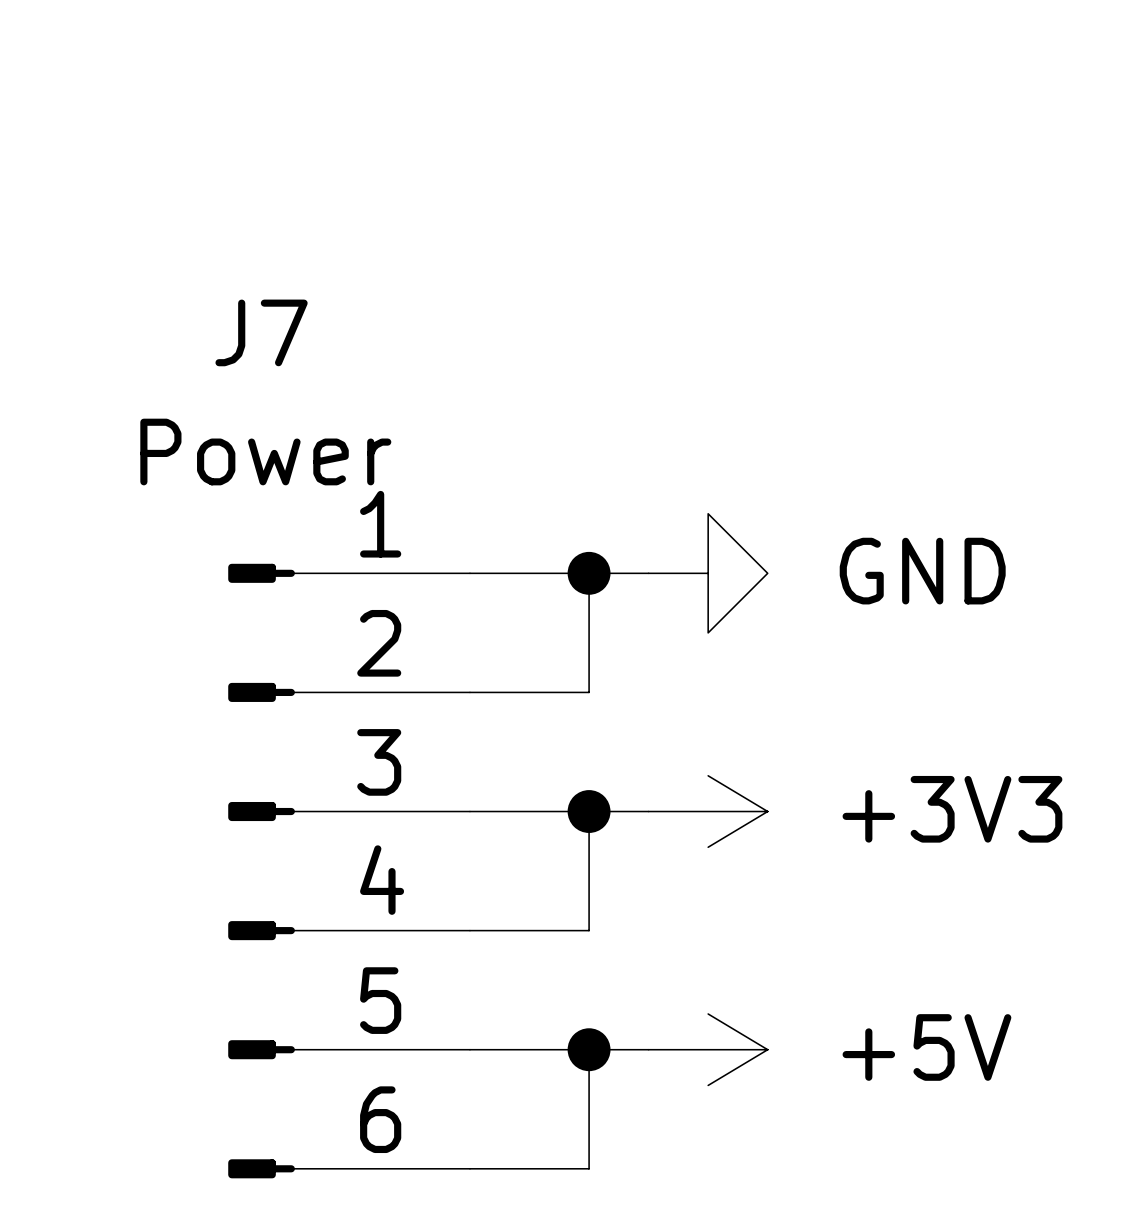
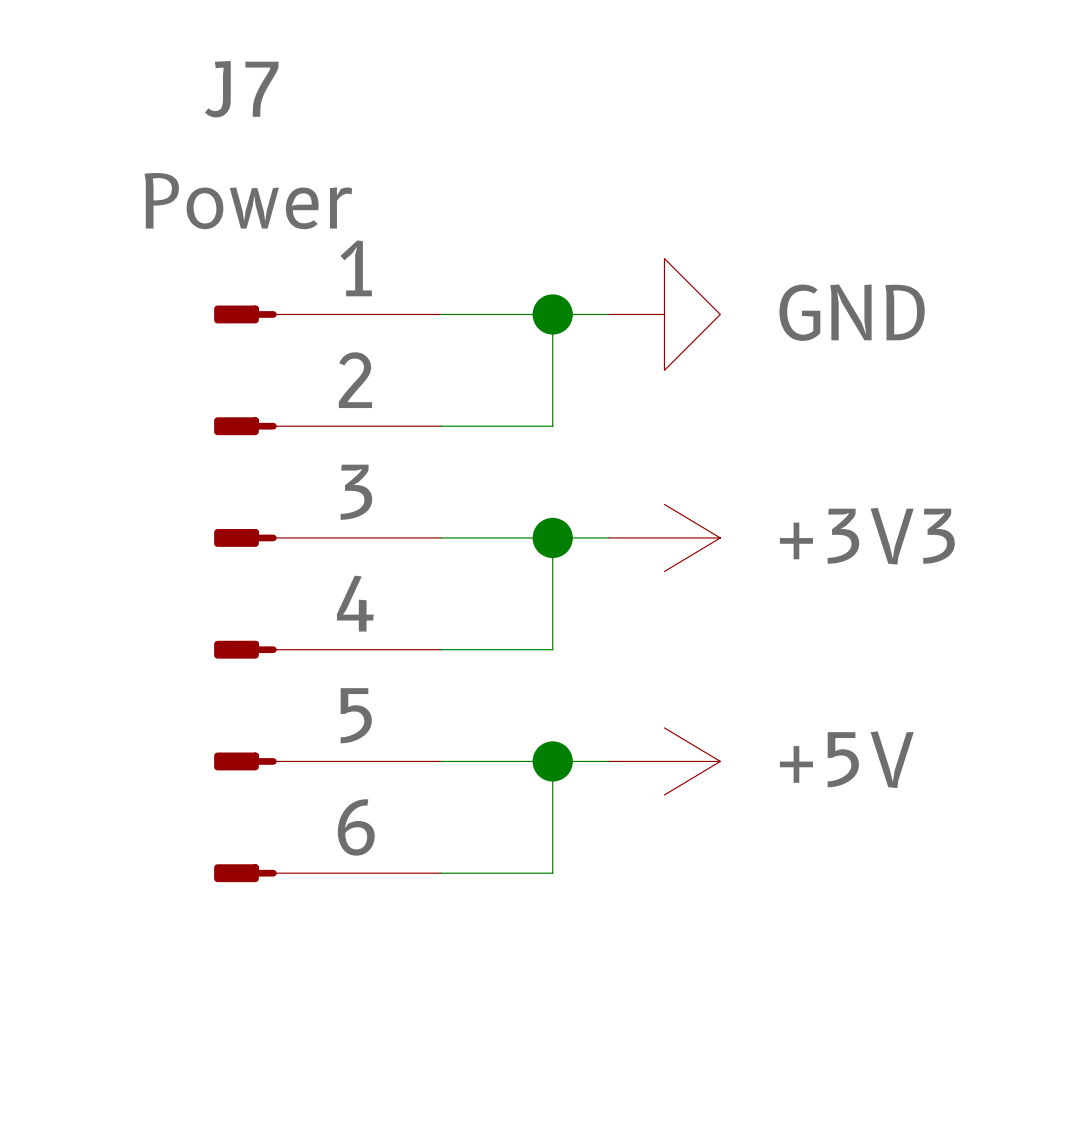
junction: none -> (552, 314)
power symbol: none -> GND (664, 314)
power symbol: GND (708, 573) -> +3V3 (664, 537)
power symbol: +3V3 (708, 811) -> +5V (664, 761)
J7 position: (349, 871) -> (327, 593)
wire: (469, 1049) (648, 1049) -> (440, 314) (608, 314)
wire: (589, 1049) (589, 1168) (469, 1168) -> (552, 314) (552, 426) (440, 426)
junction: (589, 1049) -> none
power symbol: +5V (708, 1049) -> none

